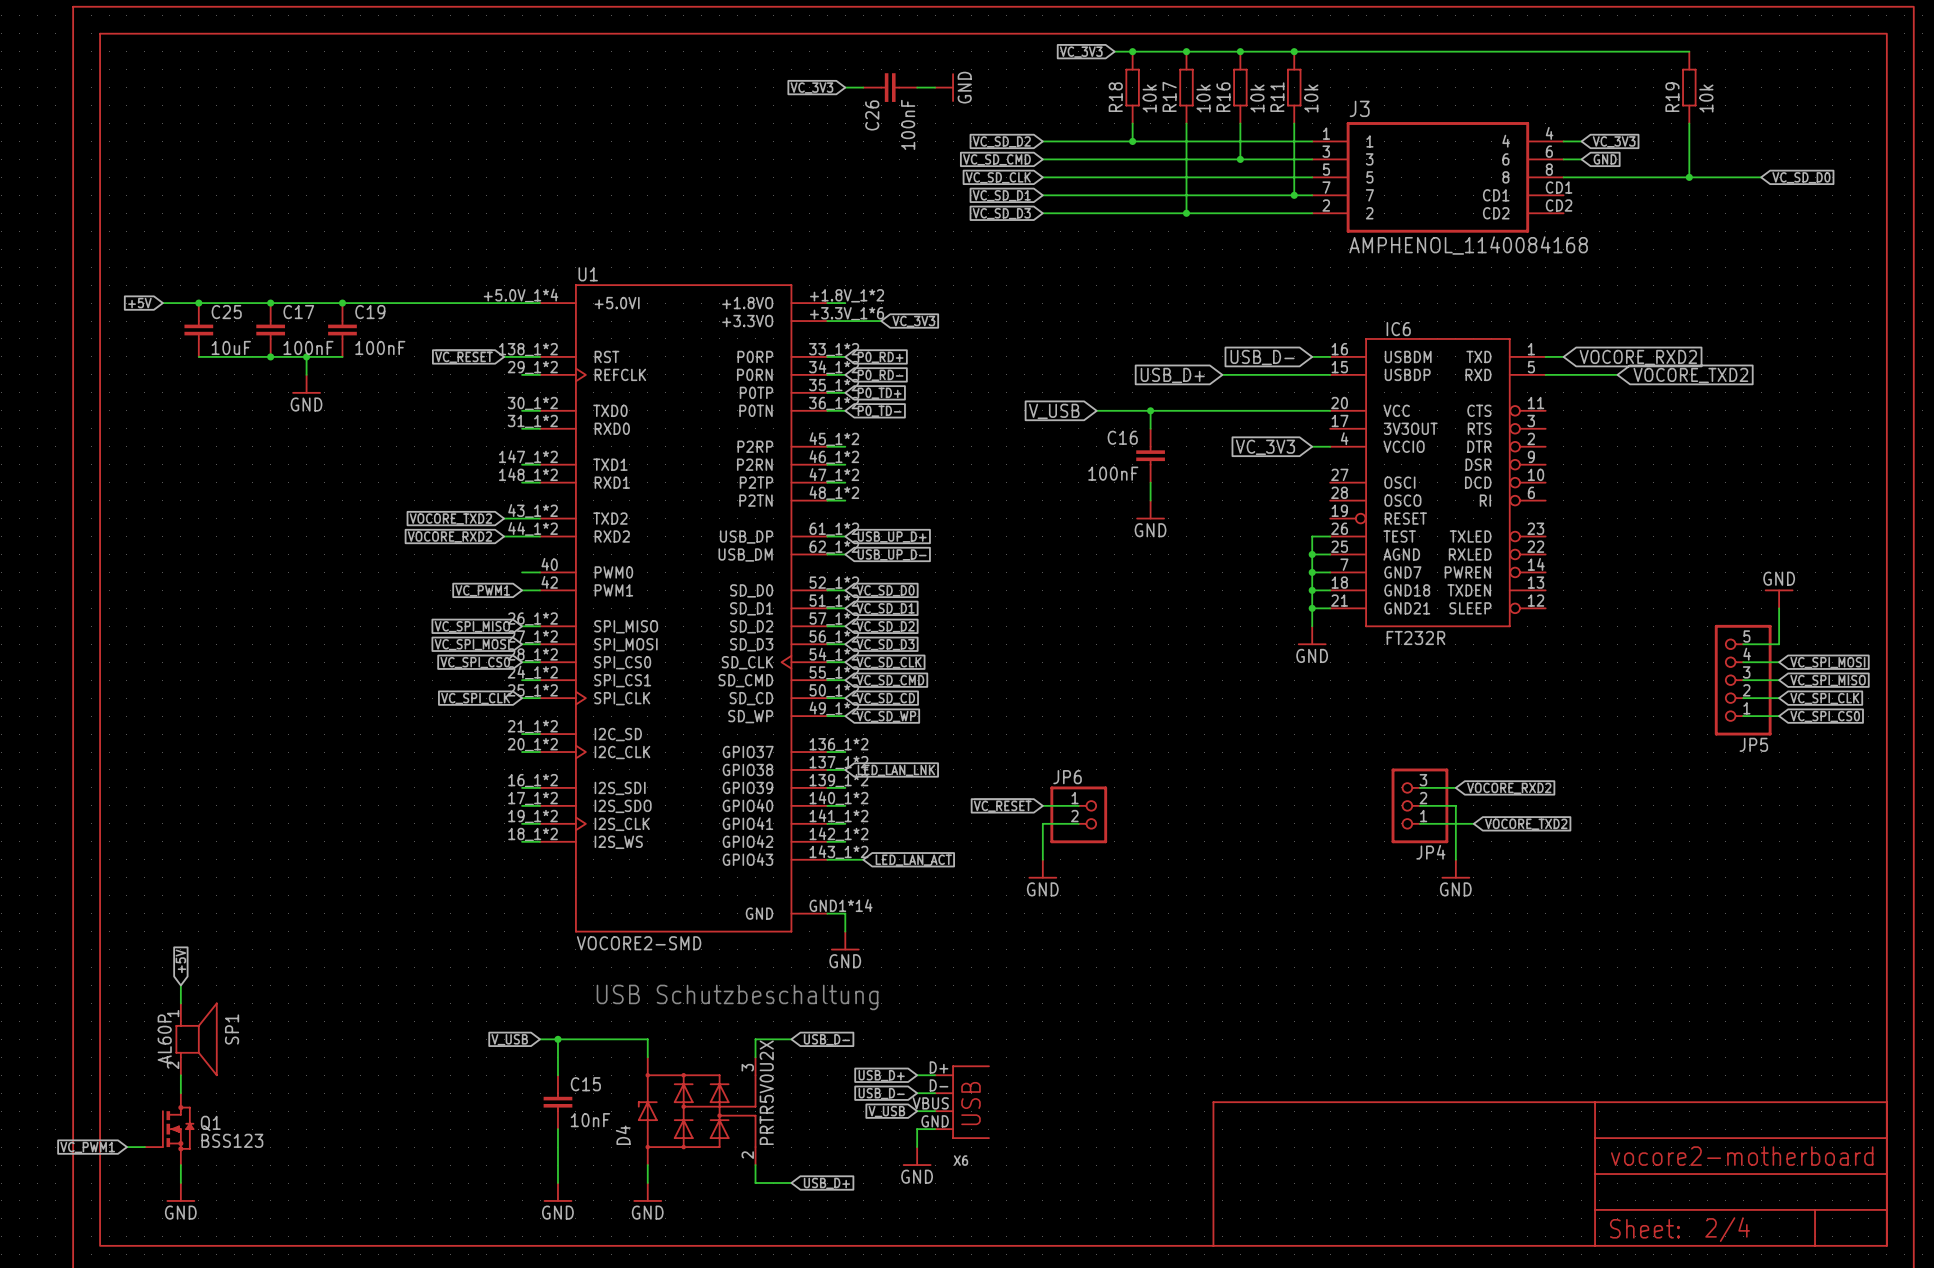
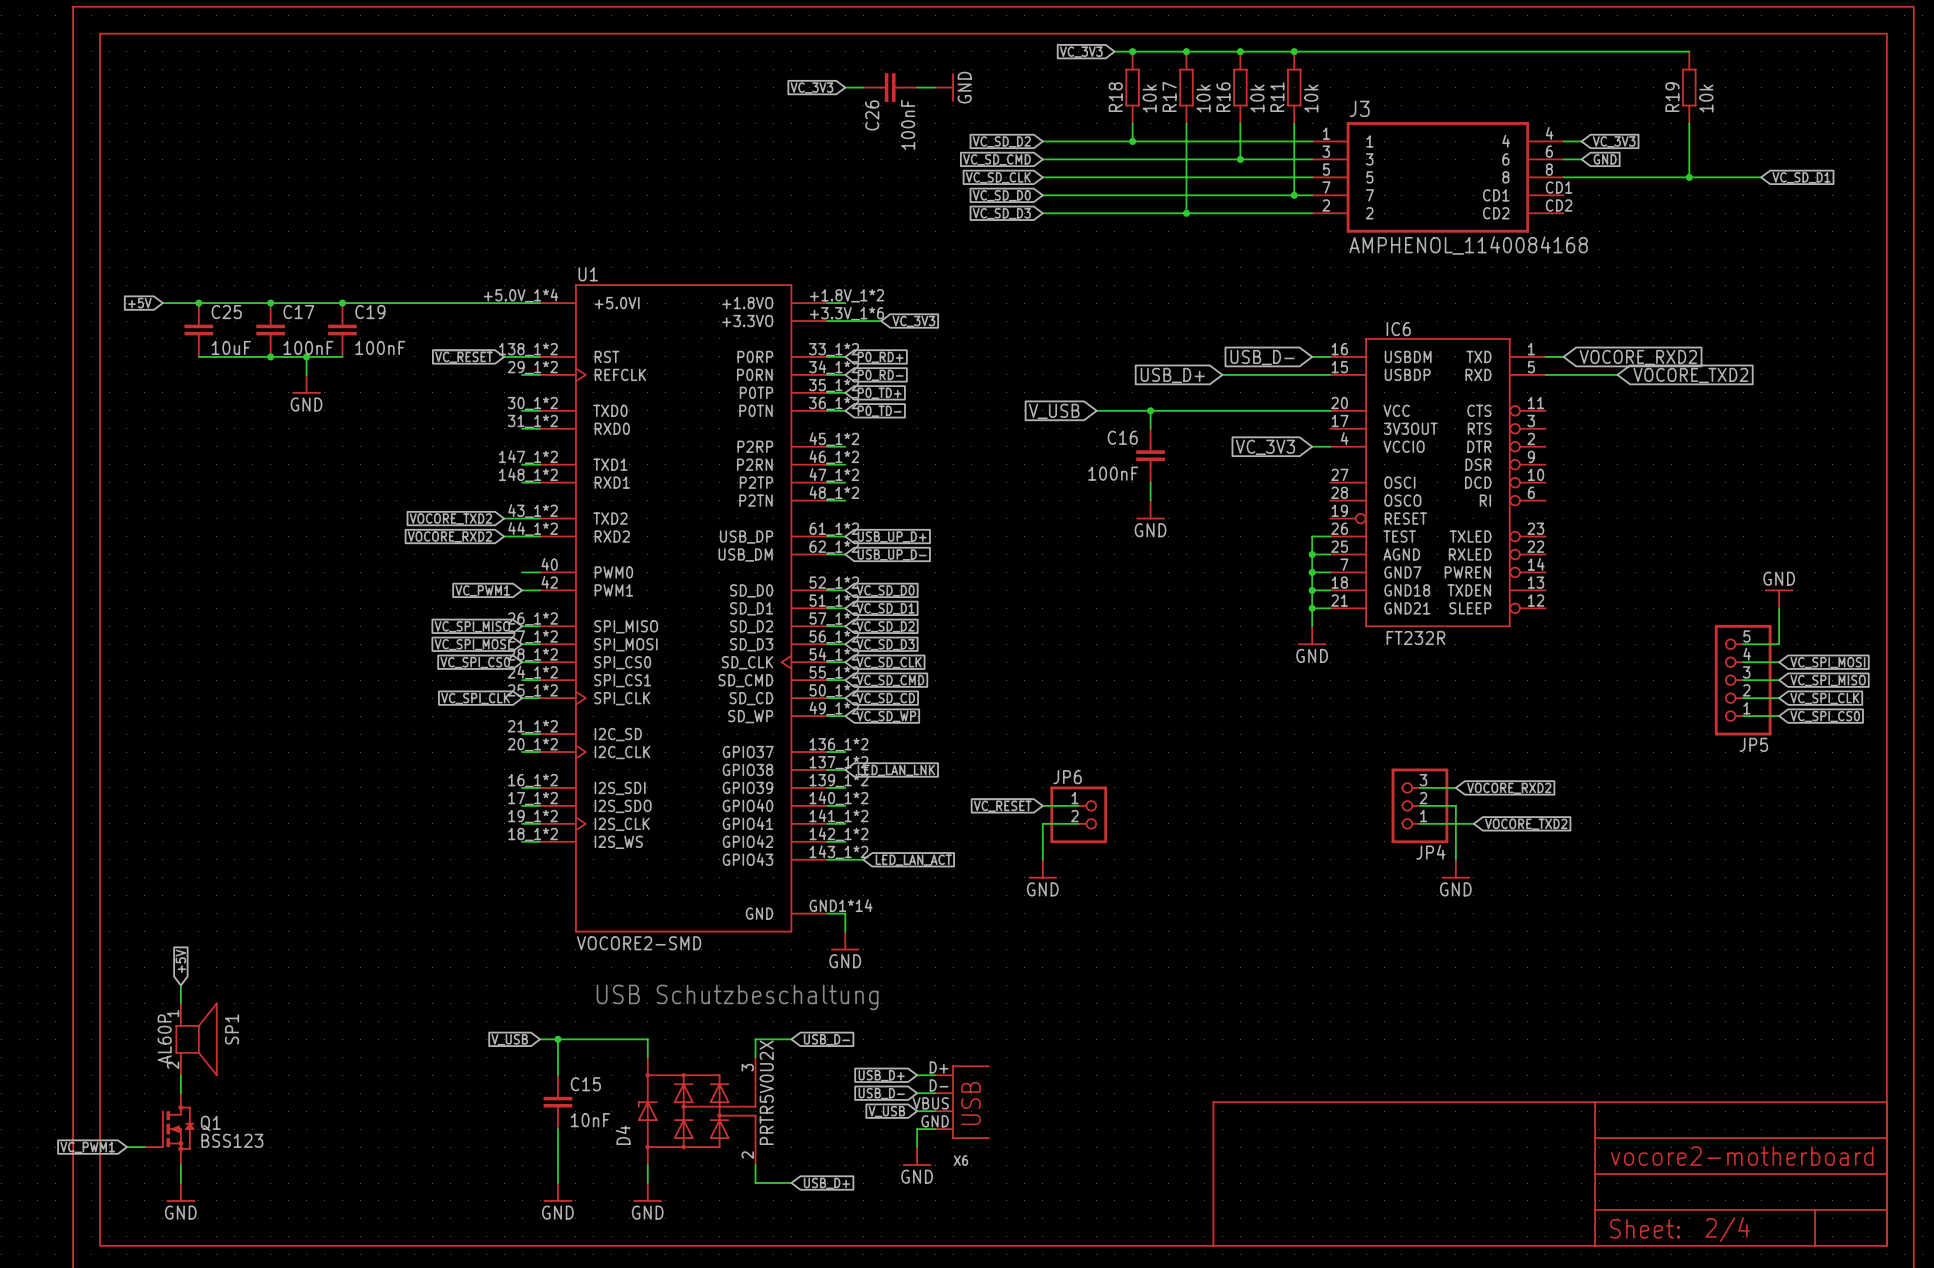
global label: VC_SD_D0 (1801, 177) -> VC_SD_D1 (1801, 177)
global label: VC_SD_D1 (1001, 195) -> VC_SD_D0 (1001, 195)

